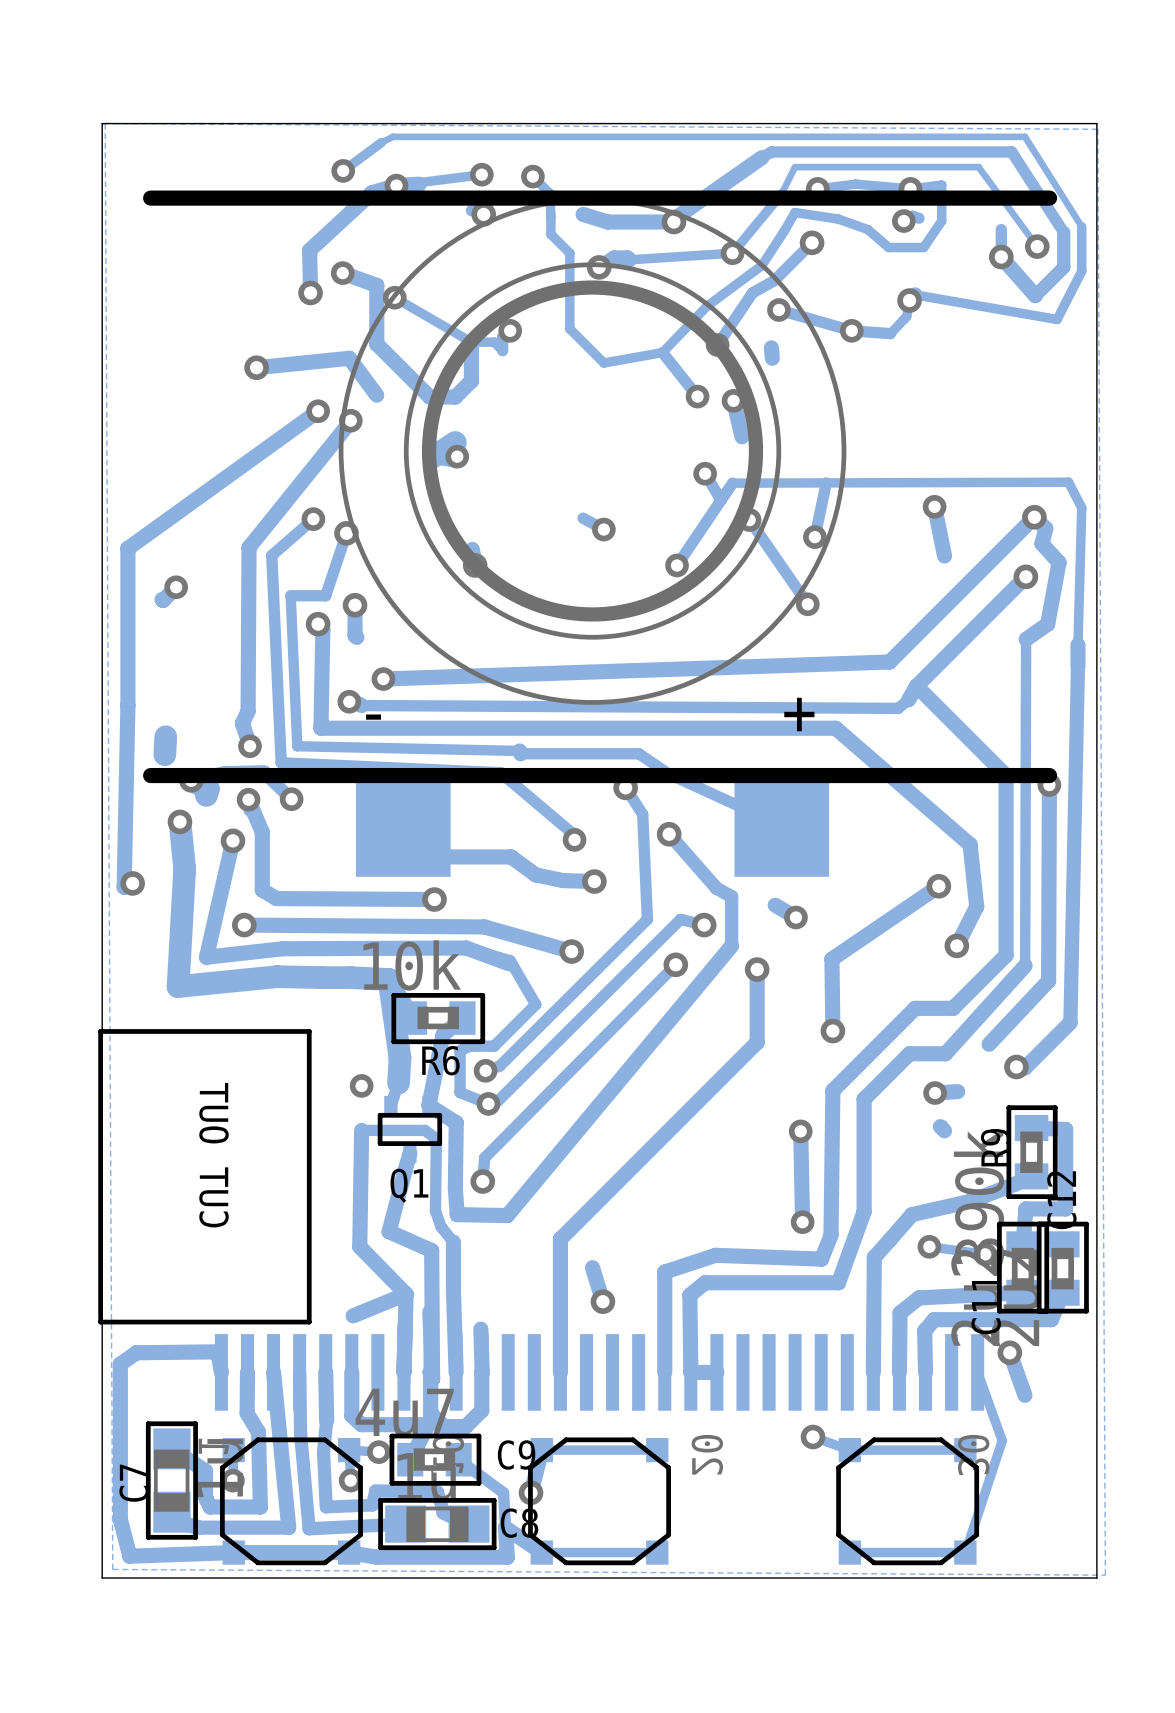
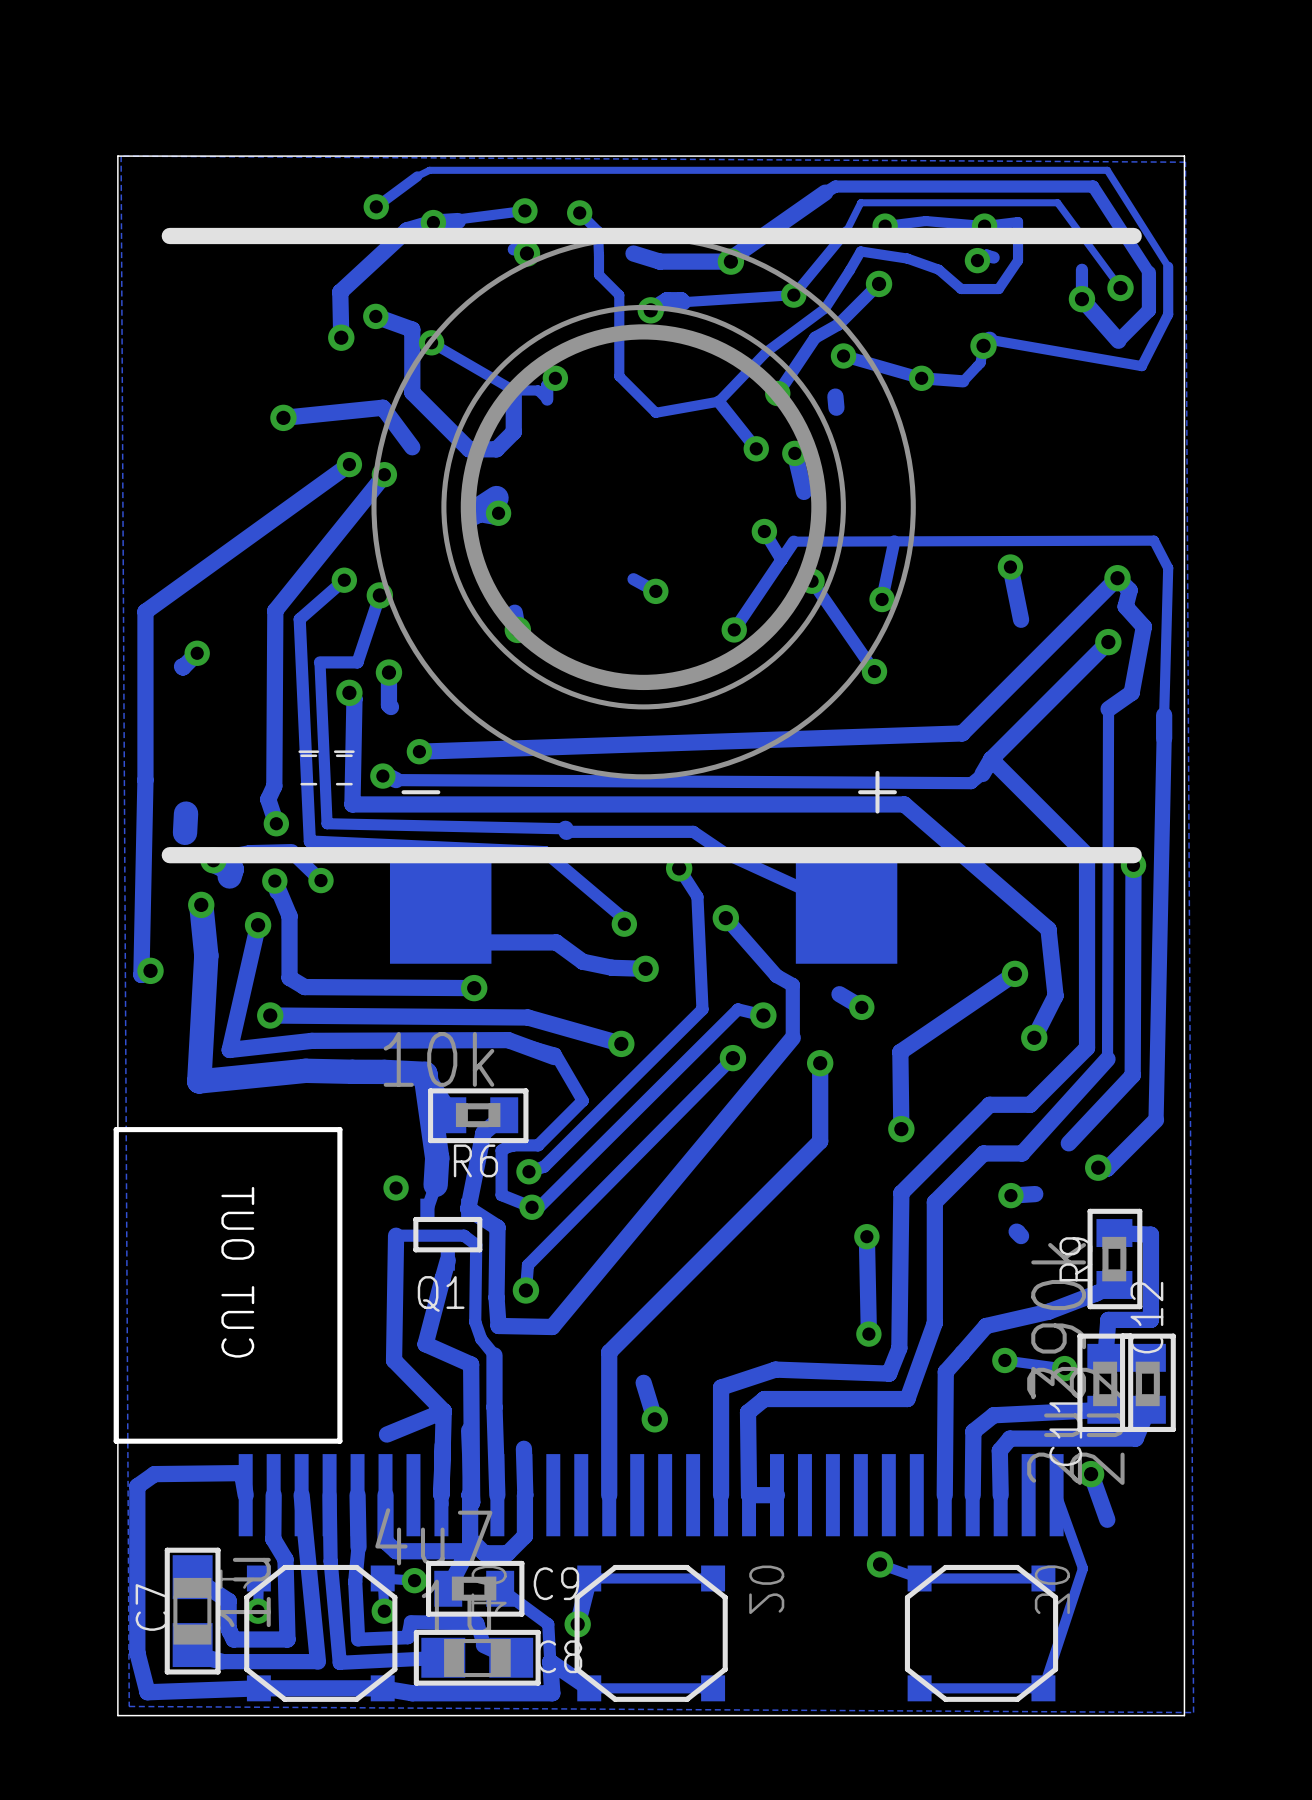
part: none -> (308, 767)
part: none -> (344, 767)

